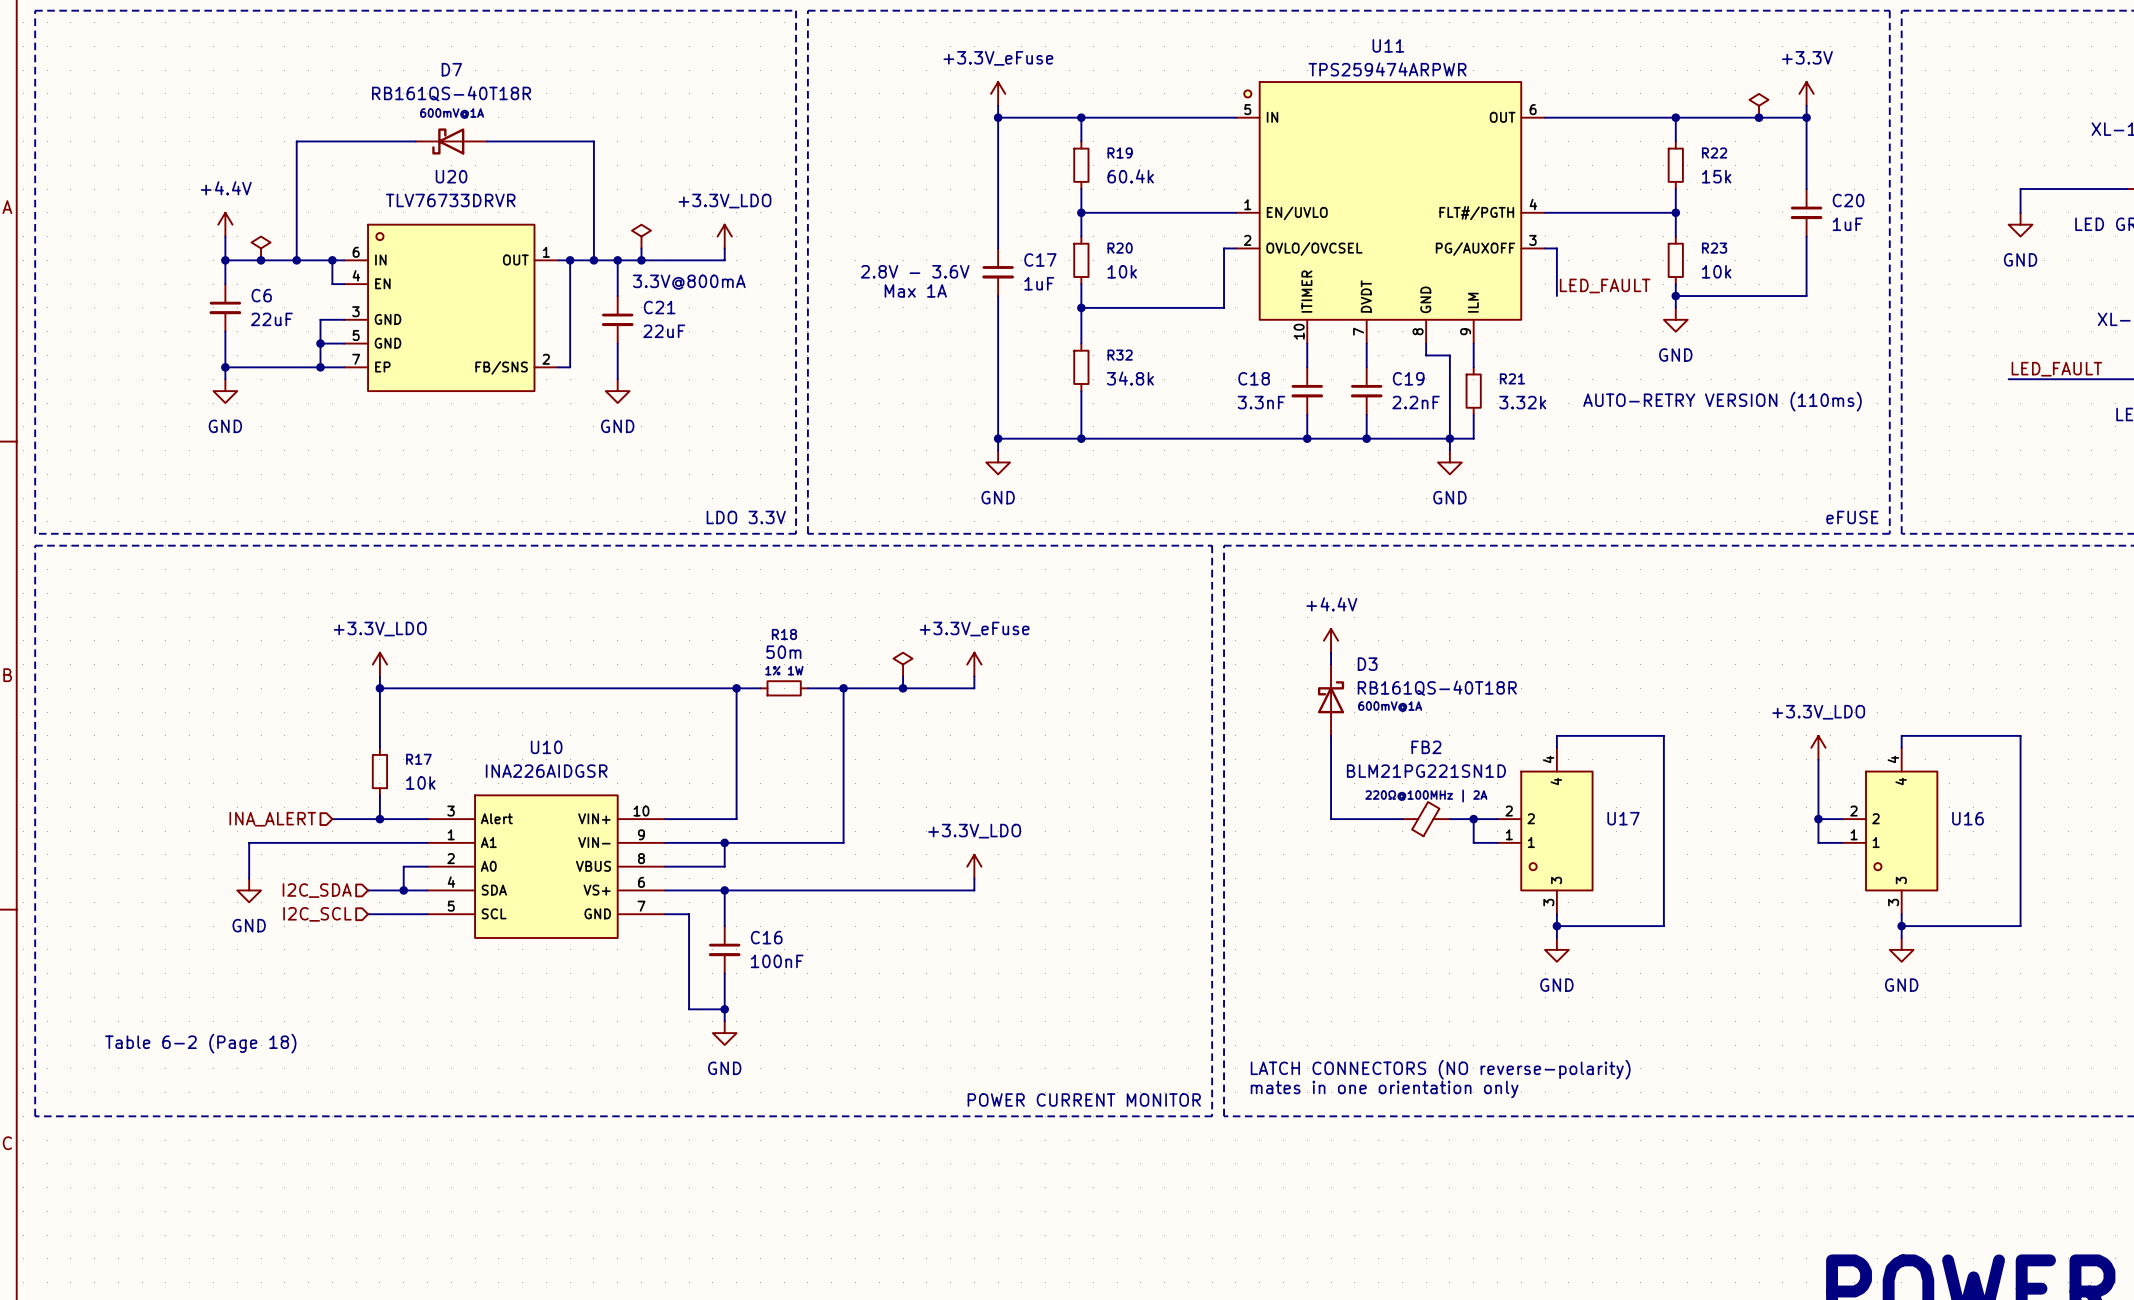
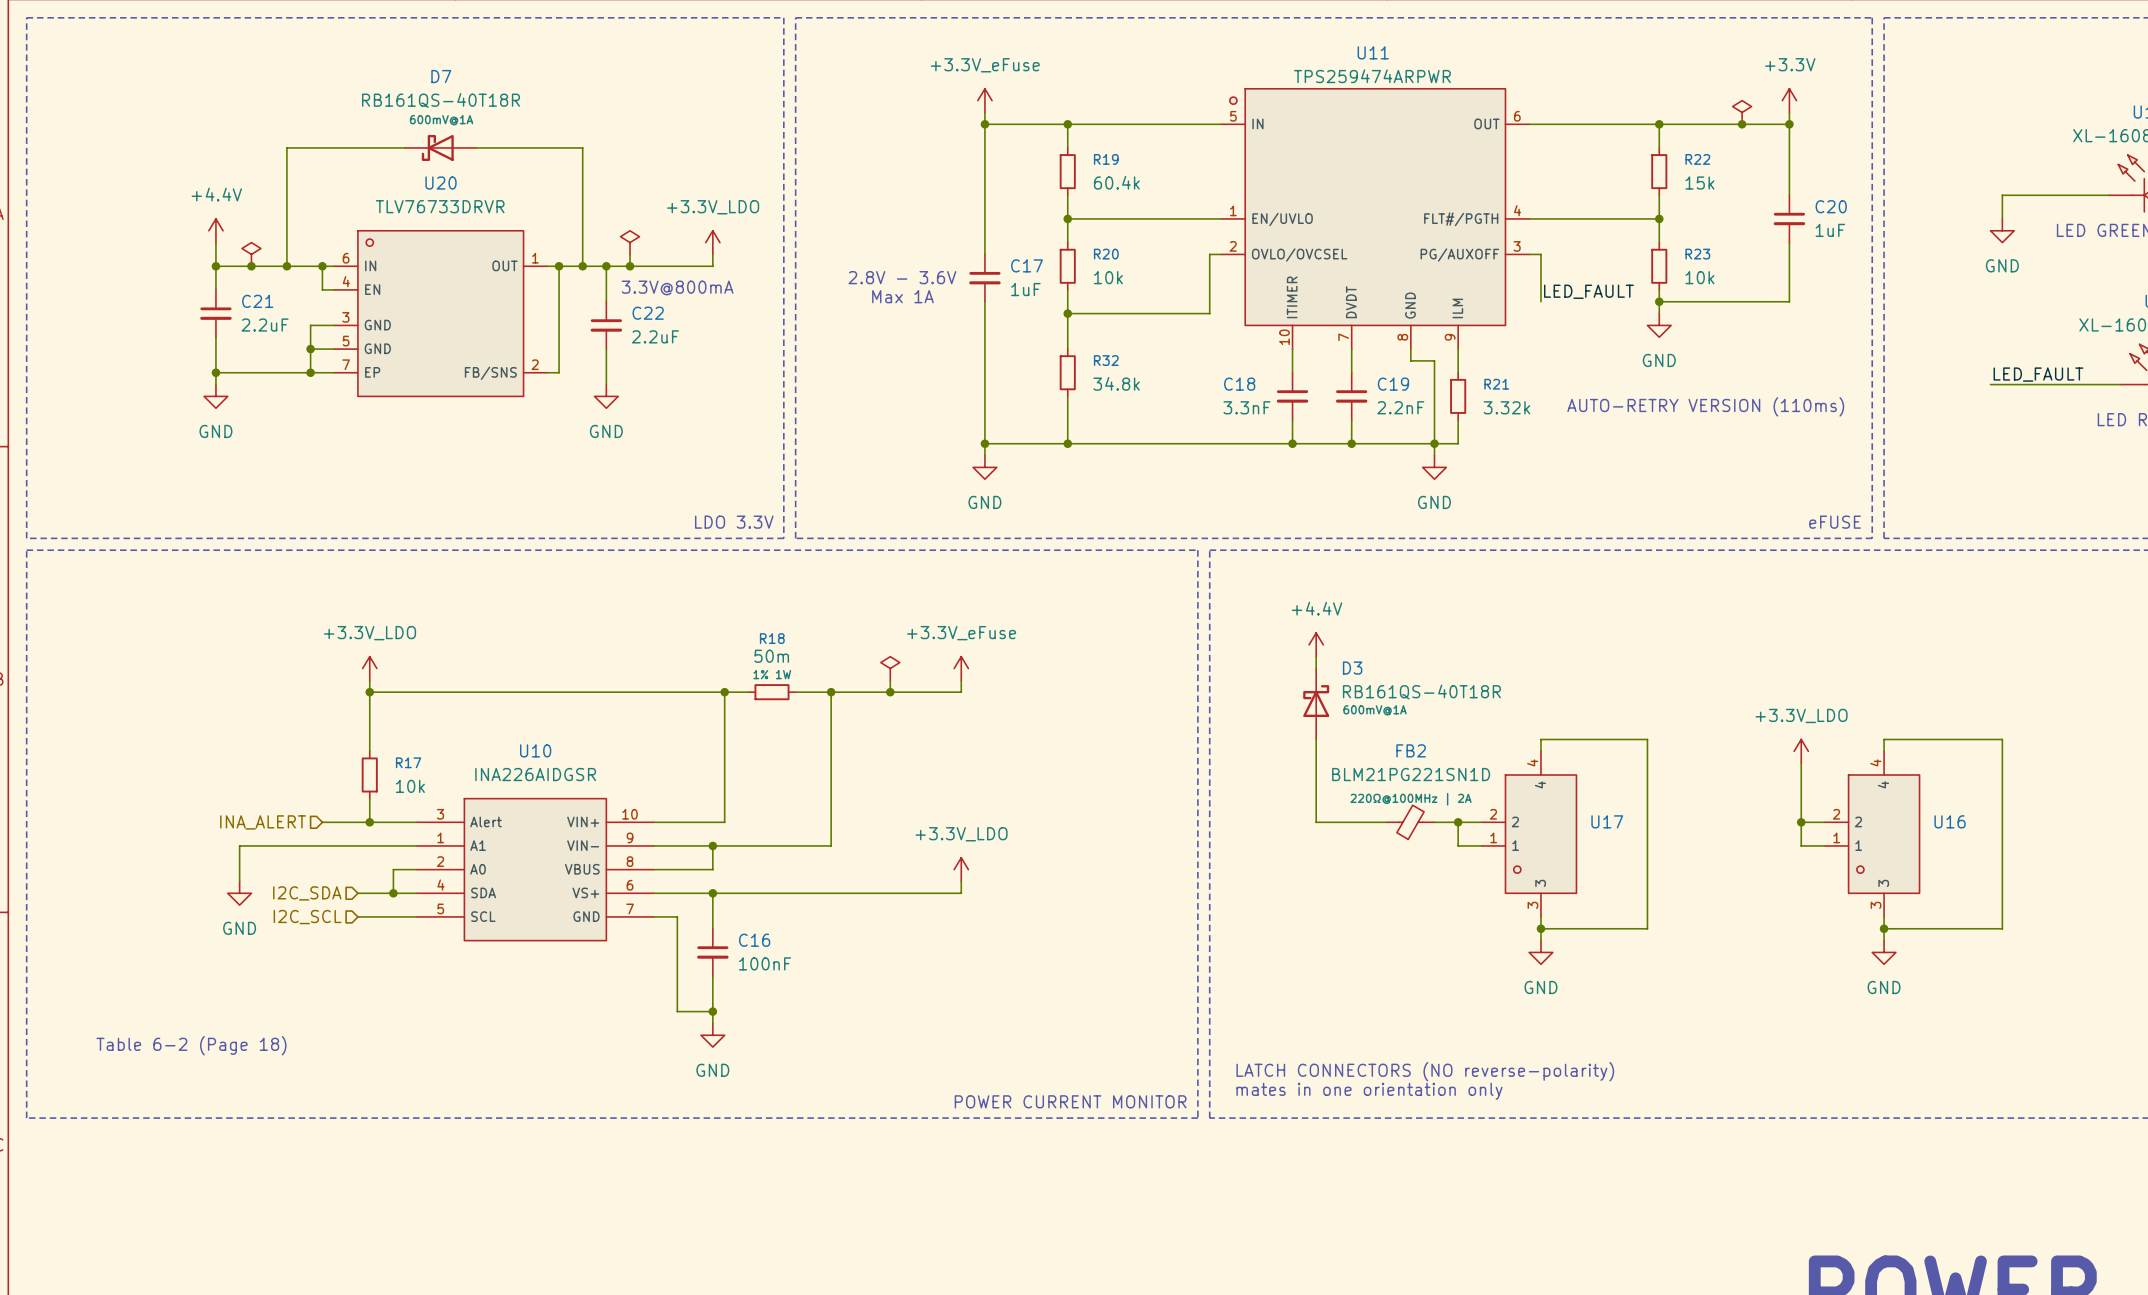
C6 name: C6 (261, 295) -> C21 (257, 301)
C21 name: C21 (659, 307) -> C22 (648, 313)
C6 value: 22uF (271, 319) -> 2.2uF (265, 325)
C21 value: 22uF (664, 331) -> 2.2uF (655, 336)

